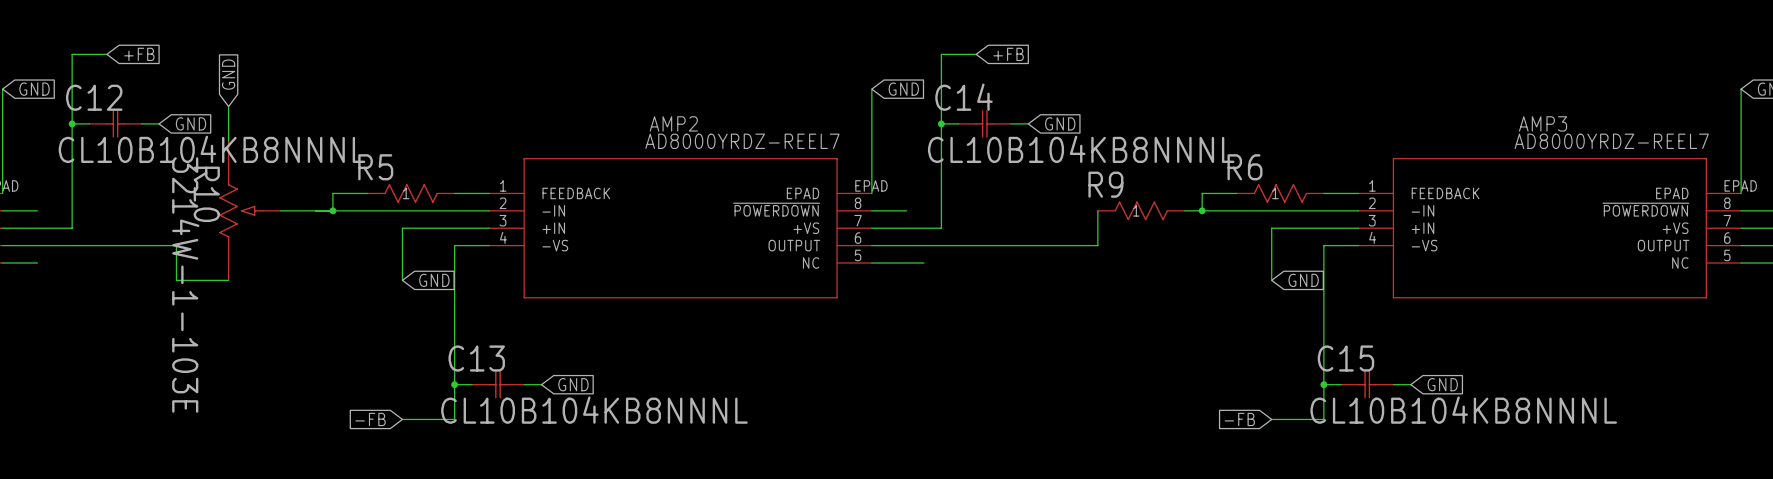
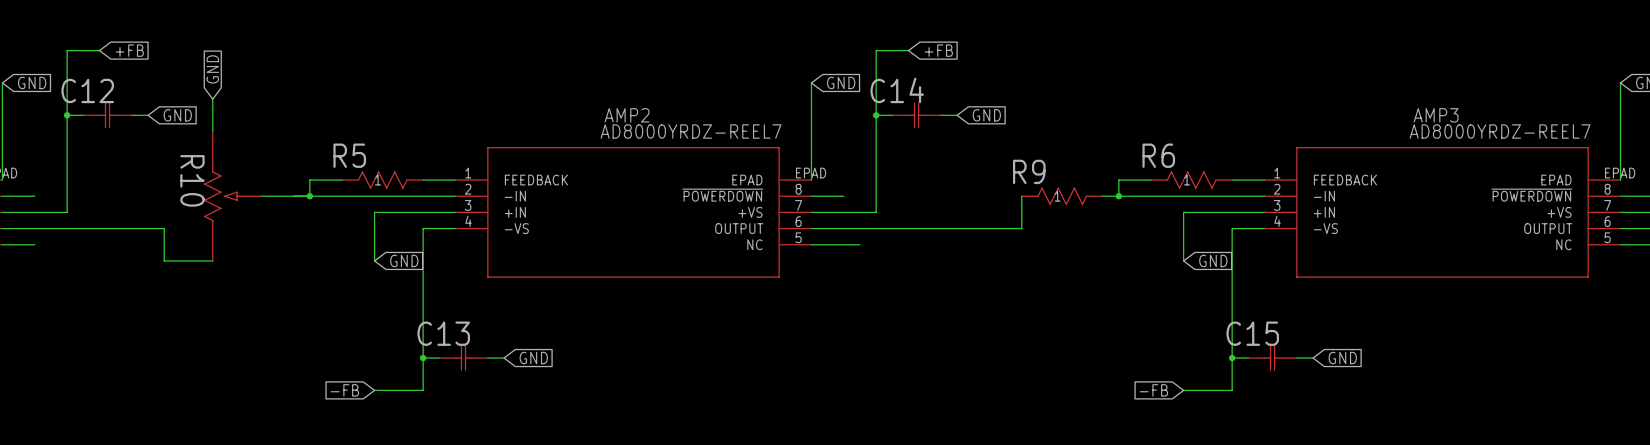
C12 value: CL10B104KB8NNNL (211, 149) -> none
C14 value: CL10B104KB8NNNL (1081, 149) -> none
R10 value: 3214W-1-103E (185, 285) -> none
C13 value: CL10B104KB8NNNL (594, 410) -> none
C15 value: CL10B104KB8NNNL (1463, 410) -> none

